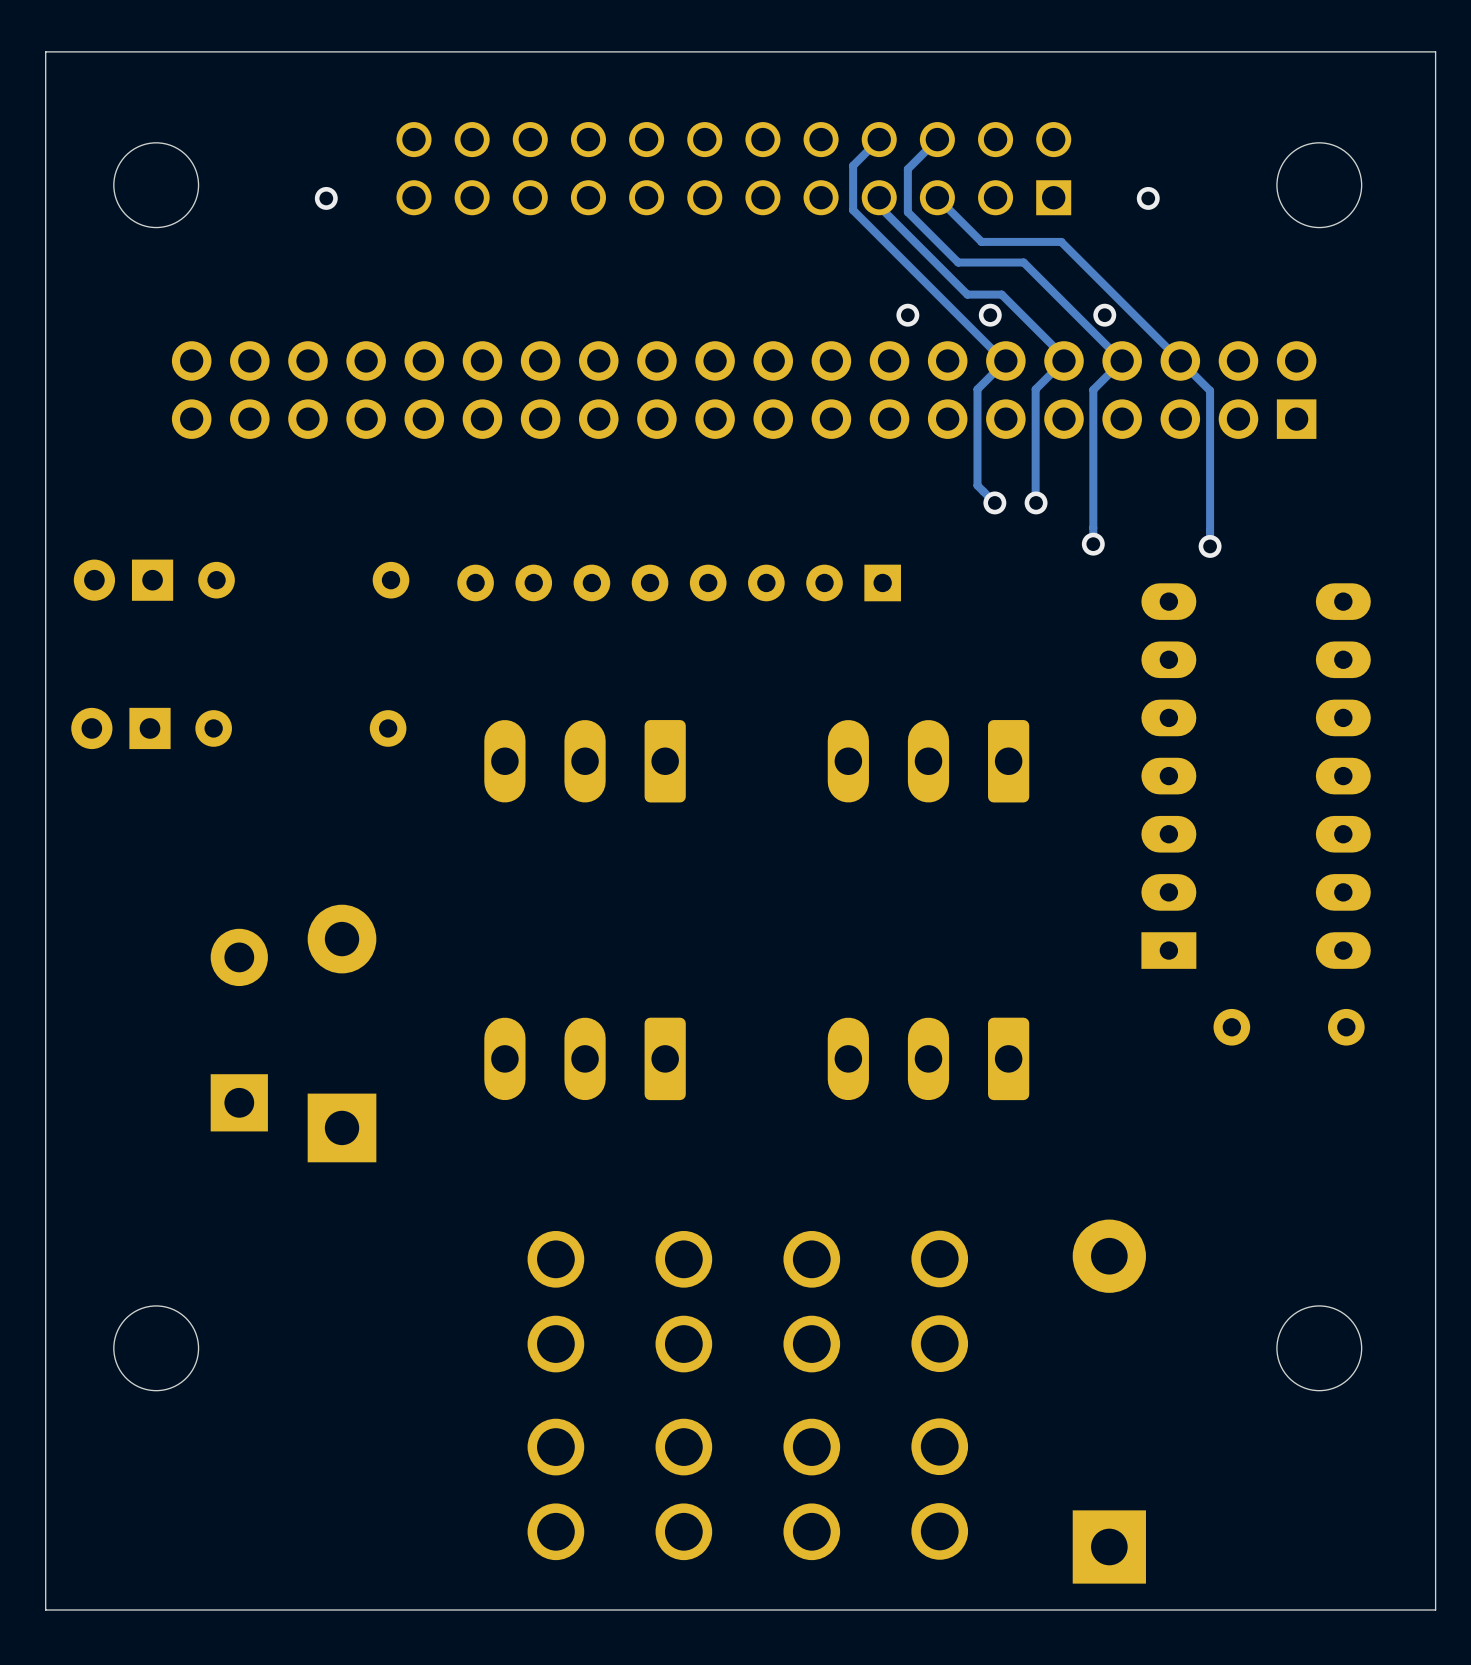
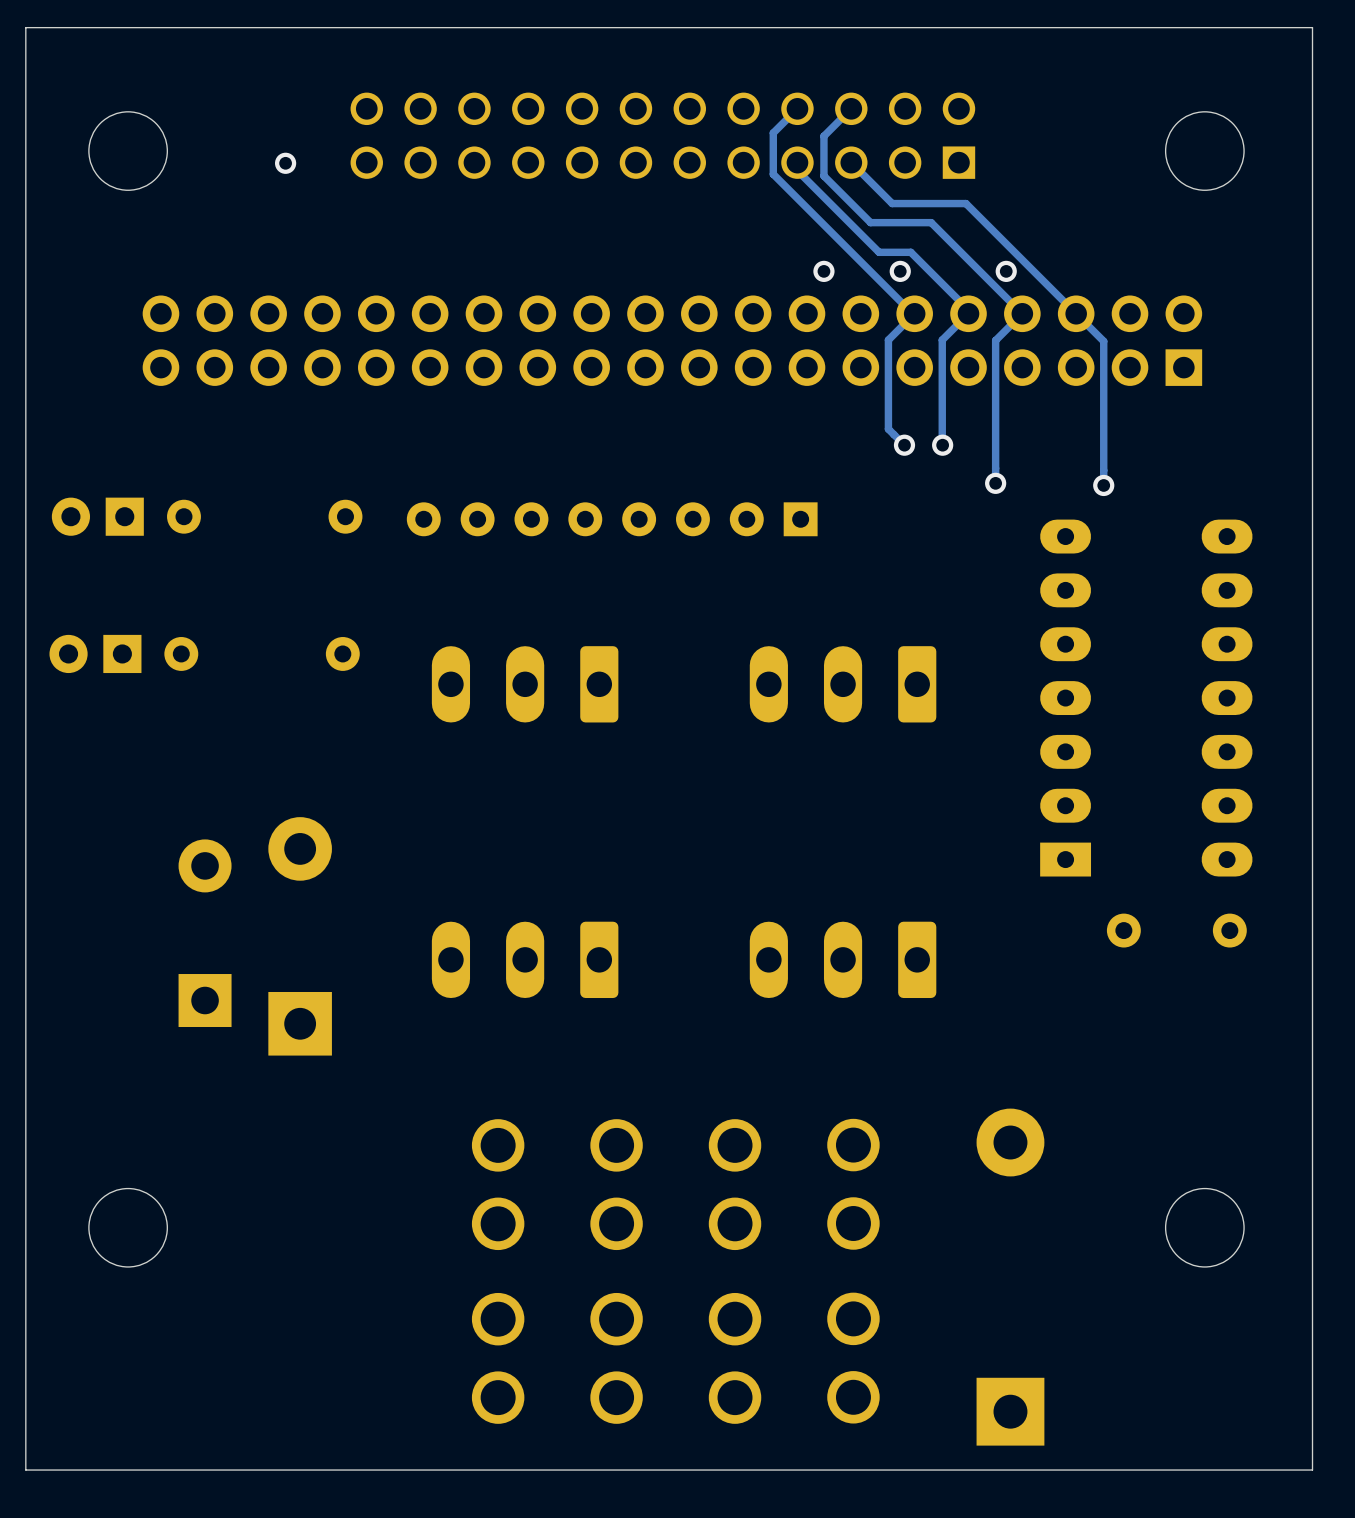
via: (1148, 198) -> none

